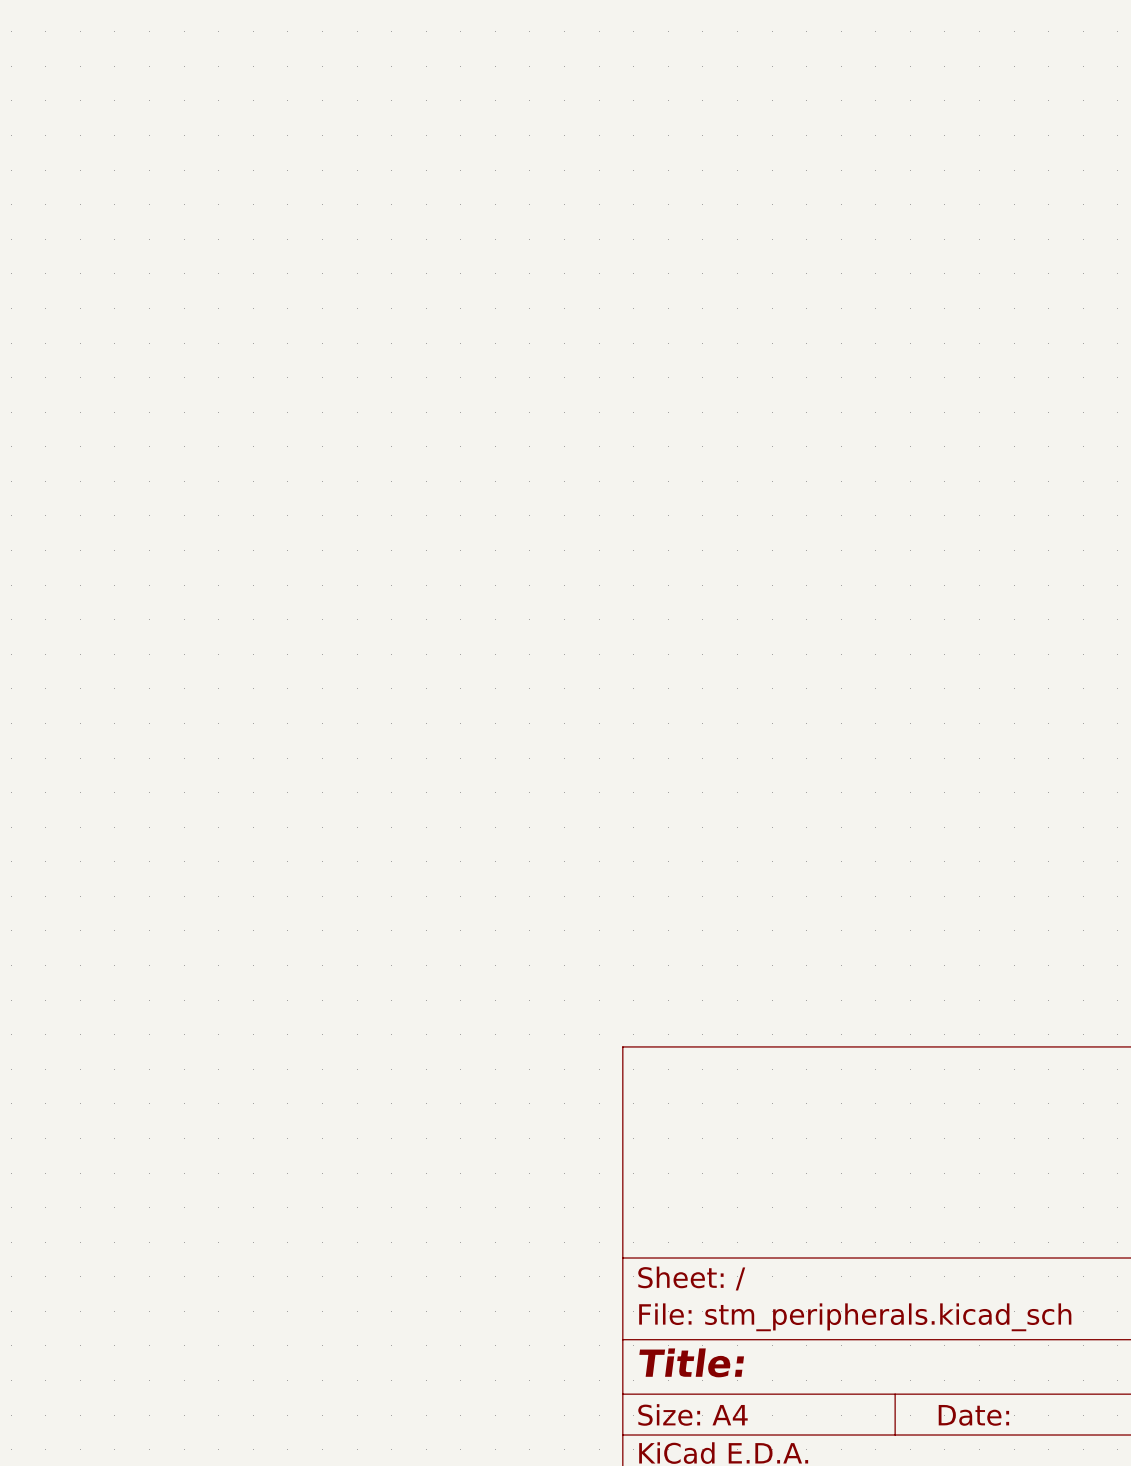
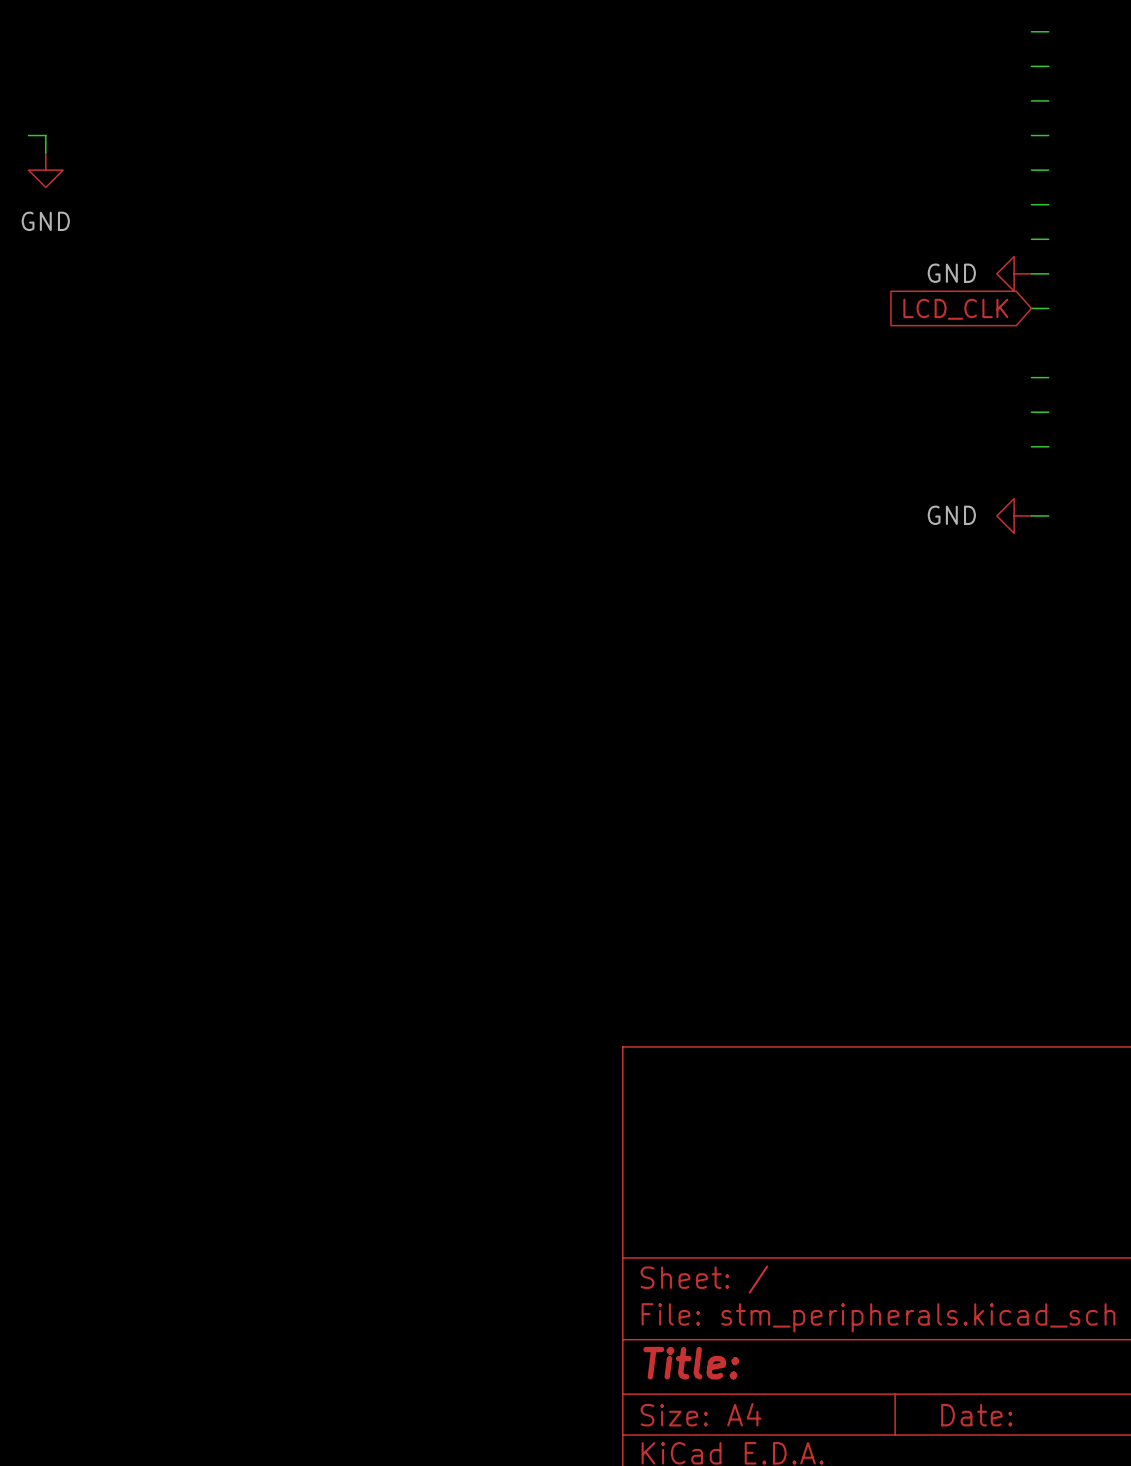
wire: none -> (1031, 31) (1048, 31)
wire: none -> (1031, 66) (1048, 66)
wire: none -> (1031, 100) (1048, 100)
wire: none -> (28, 135) (45, 135) (45, 152)
wire: none -> (1031, 135) (1048, 135)
power symbol: none -> GND (45, 170)
wire: none -> (1031, 170) (1048, 170)
wire: none -> (1031, 204) (1048, 204)
wire: none -> (1031, 239) (1048, 239)
power symbol: none -> GND (1014, 273)
wire: none -> (1031, 273) (1048, 273)
wire: none -> (1031, 308) (1048, 308)
global label: none -> LCD_CLK (955, 309)
wire: none -> (1031, 377) (1048, 377)
wire: none -> (1031, 412) (1048, 412)
wire: none -> (1031, 446) (1048, 446)
power symbol: none -> GND (1014, 515)
wire: none -> (1031, 515) (1048, 515)

